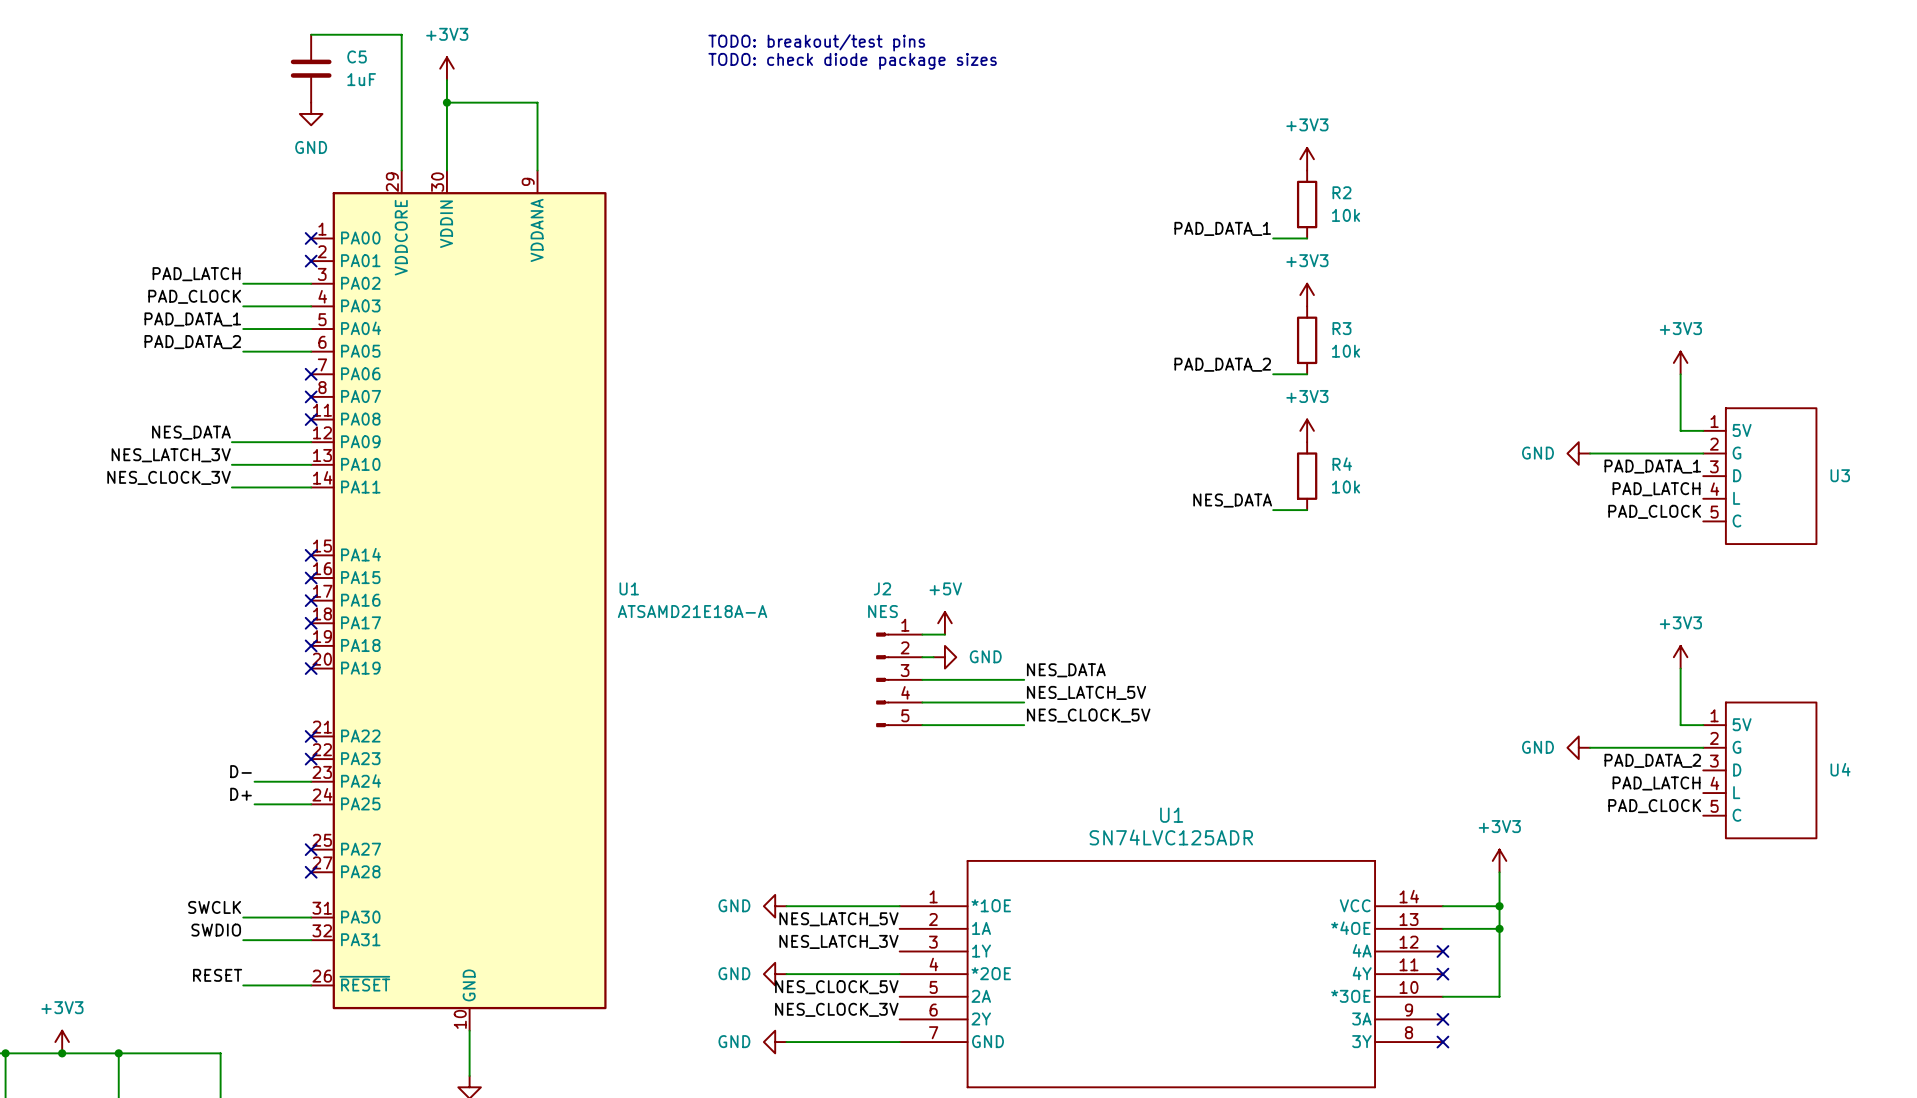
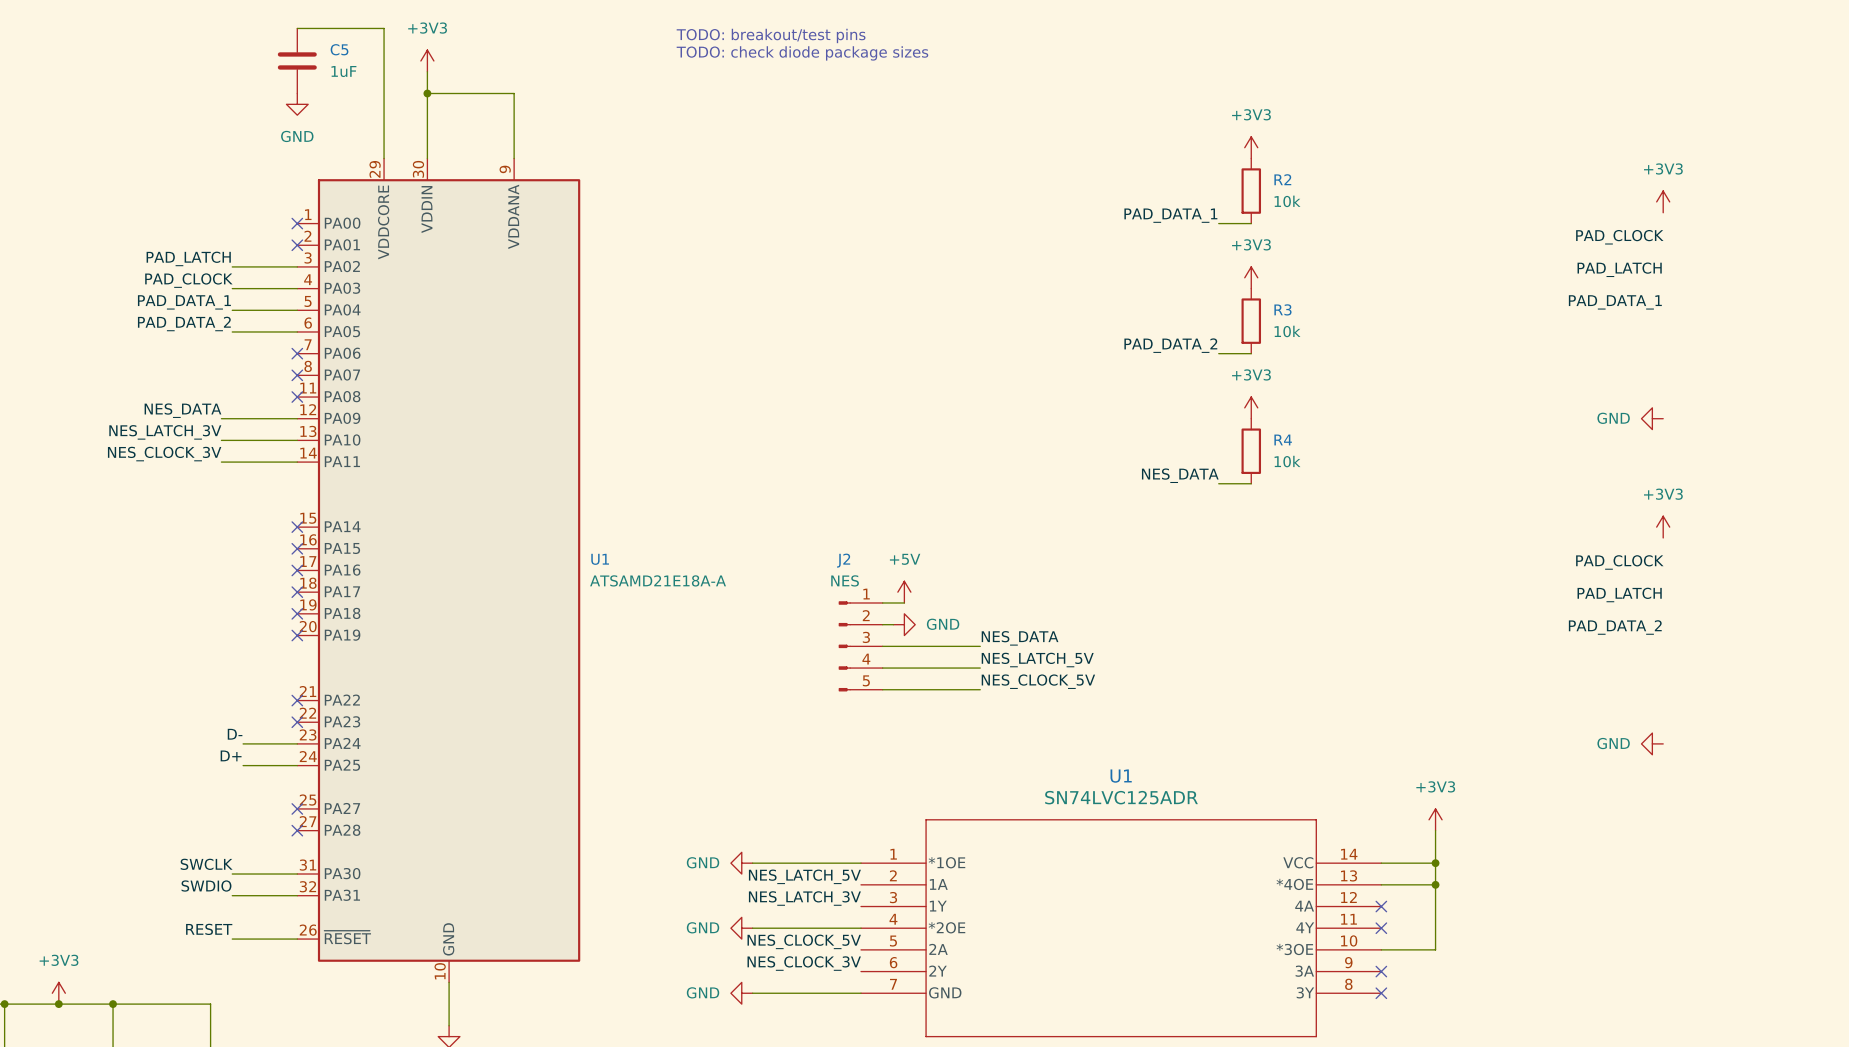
power symbol: none -> +3V3 (1663, 201)
label: none -> PAD_CLOCK (1619, 237)
label: none -> PAD_LATCH (1619, 269)
power symbol: +3V3 (1680, 362) -> none
wire: (1680, 374) (1680, 430) (1703, 430) -> none
power symbol position: GND (1578, 453) -> GND (1652, 418)
wire: (1590, 453) (1703, 453) -> none
label position: PAD_DATA_1 (1652, 466) -> PAD_DATA_1 (1615, 302)
U3: (1759, 476) -> none
label: PAD_LATCH (1656, 489) -> none
label position: PAD_CLOCK (1654, 511) -> PAD_CLOCK (1619, 562)
power symbol: none -> +3V3 (1663, 527)
label: none -> PAD_LATCH (1619, 594)
power symbol: +3V3 (1680, 657) -> none
wire: (1680, 668) (1680, 725) (1703, 725) -> none
power symbol position: GND (1578, 747) -> GND (1652, 743)
wire: (1590, 747) (1703, 747) -> none
label position: PAD_DATA_2 (1652, 760) -> PAD_DATA_2 (1615, 627)
U4: (1759, 770) -> none
label: PAD_LATCH (1656, 783) -> none
label: PAD_CLOCK (1654, 806) -> none

